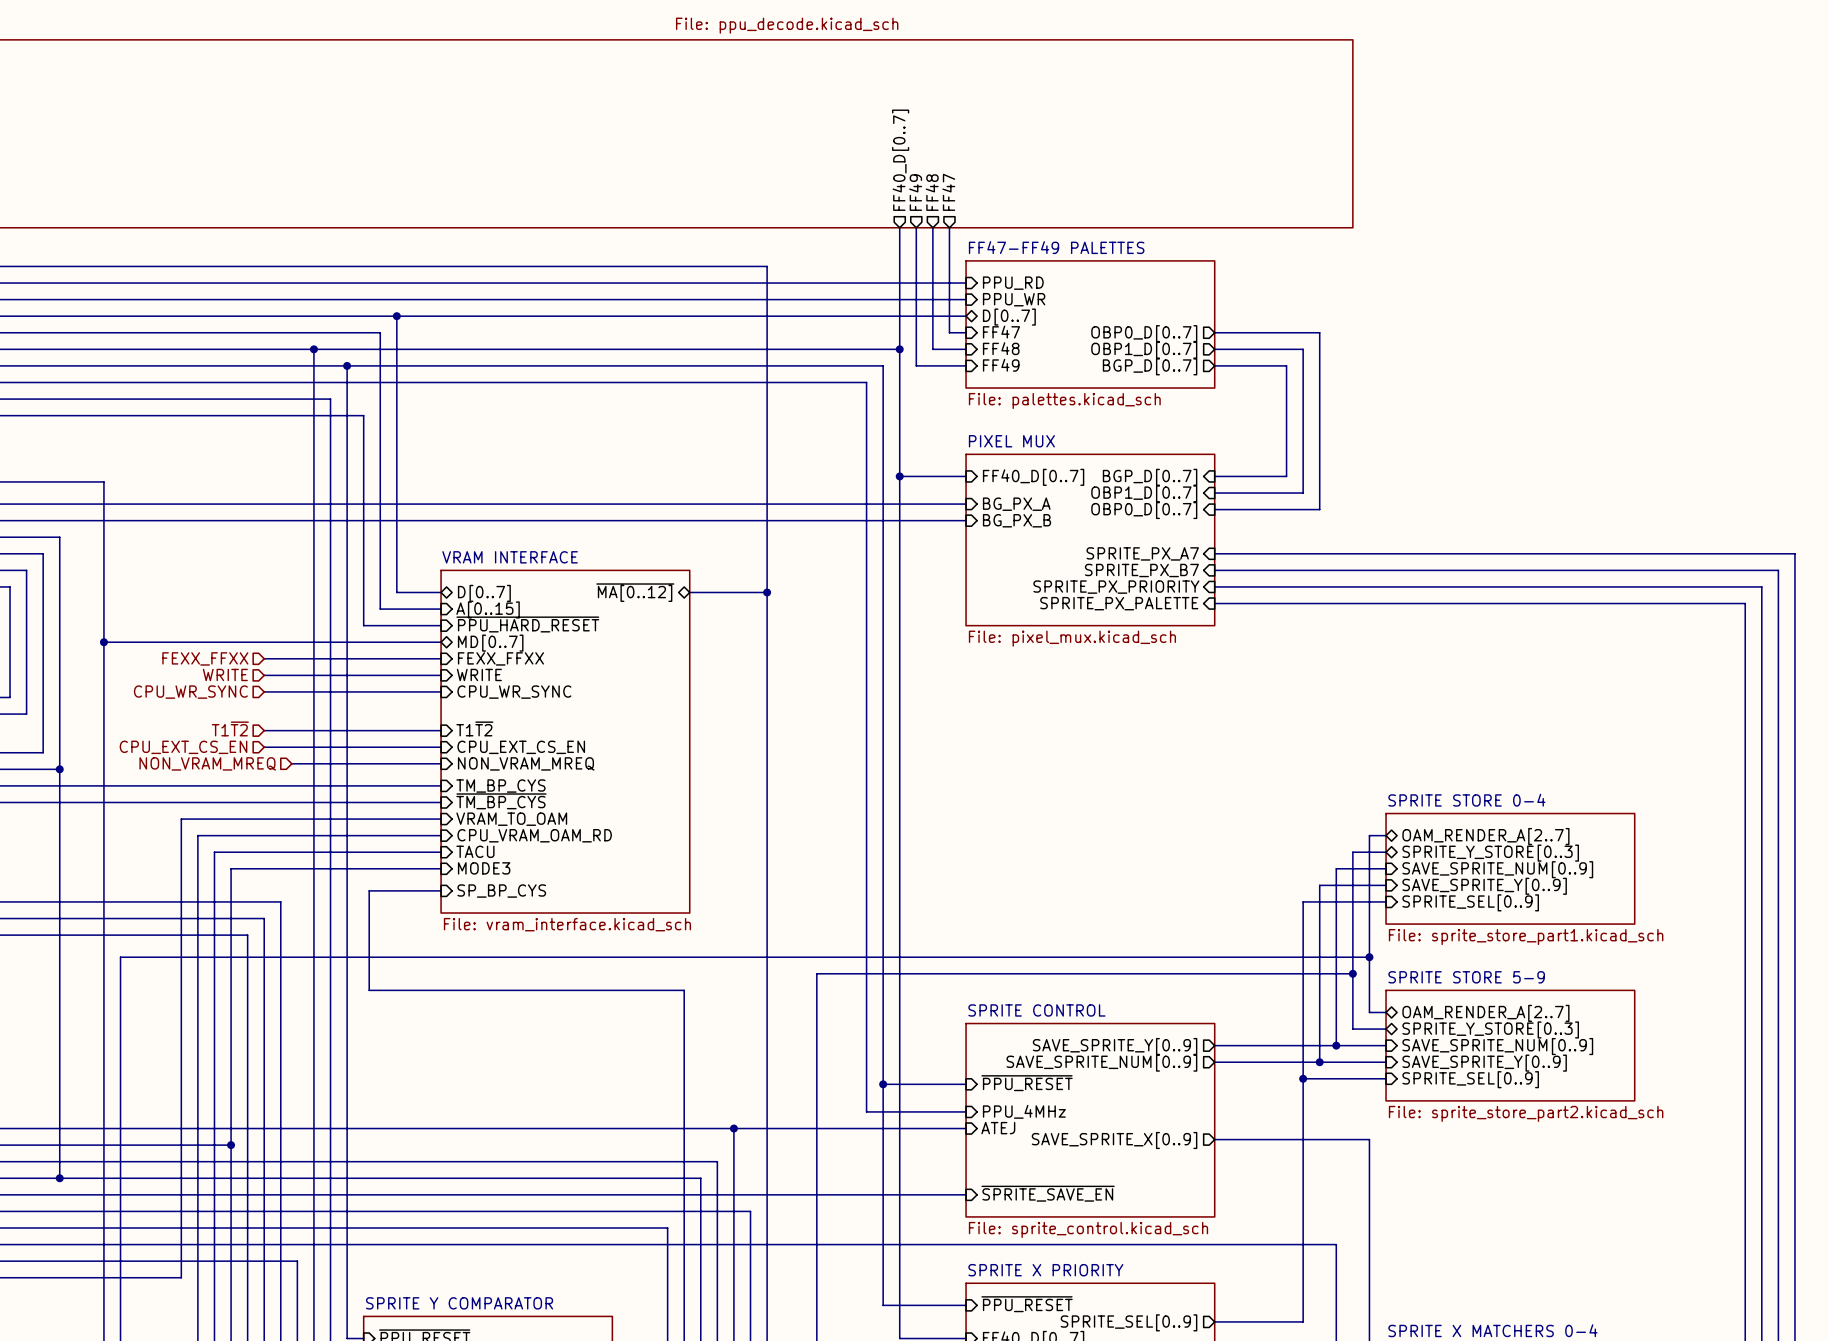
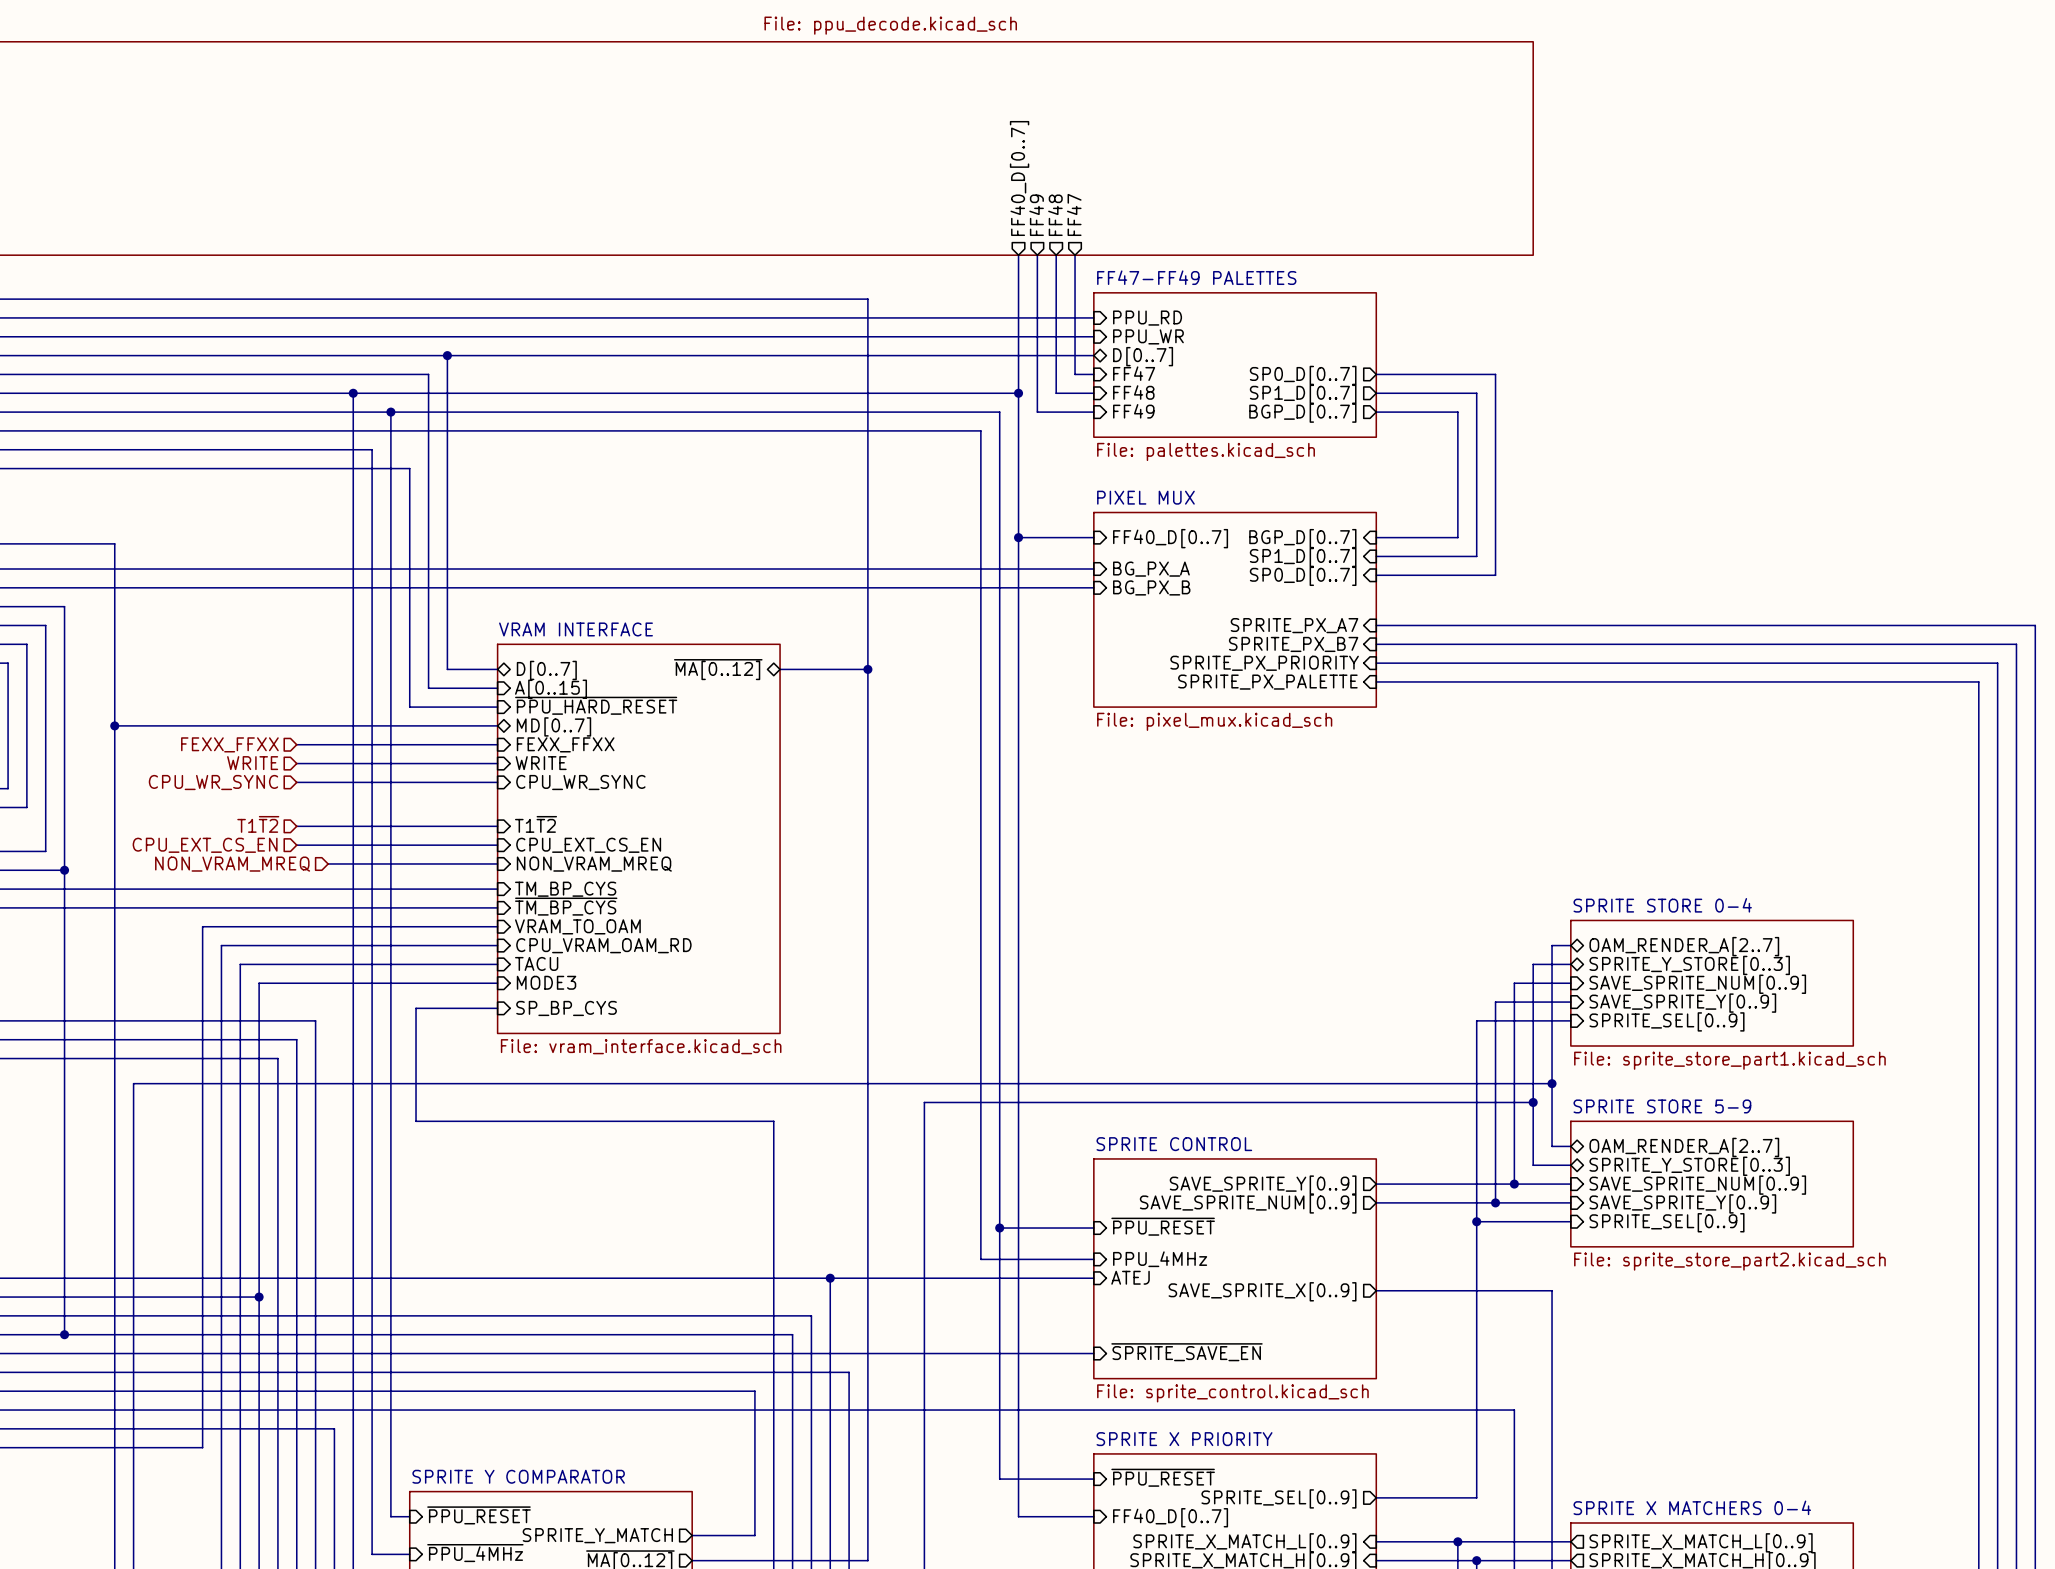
sheet pin: OBP0_D[0..7] (1144, 333) -> SP0_D[0..7] (1303, 375)
sheet pin: OBP1_D[0..7] (1144, 350) -> SP1_D[0..7] (1303, 394)
sheet pin: OBP1_D[0..7] (1144, 493) -> SP1_D[0..7] (1303, 557)
sheet pin: OBP0_D[0..7] (1144, 510) -> SP0_D[0..7] (1303, 576)

